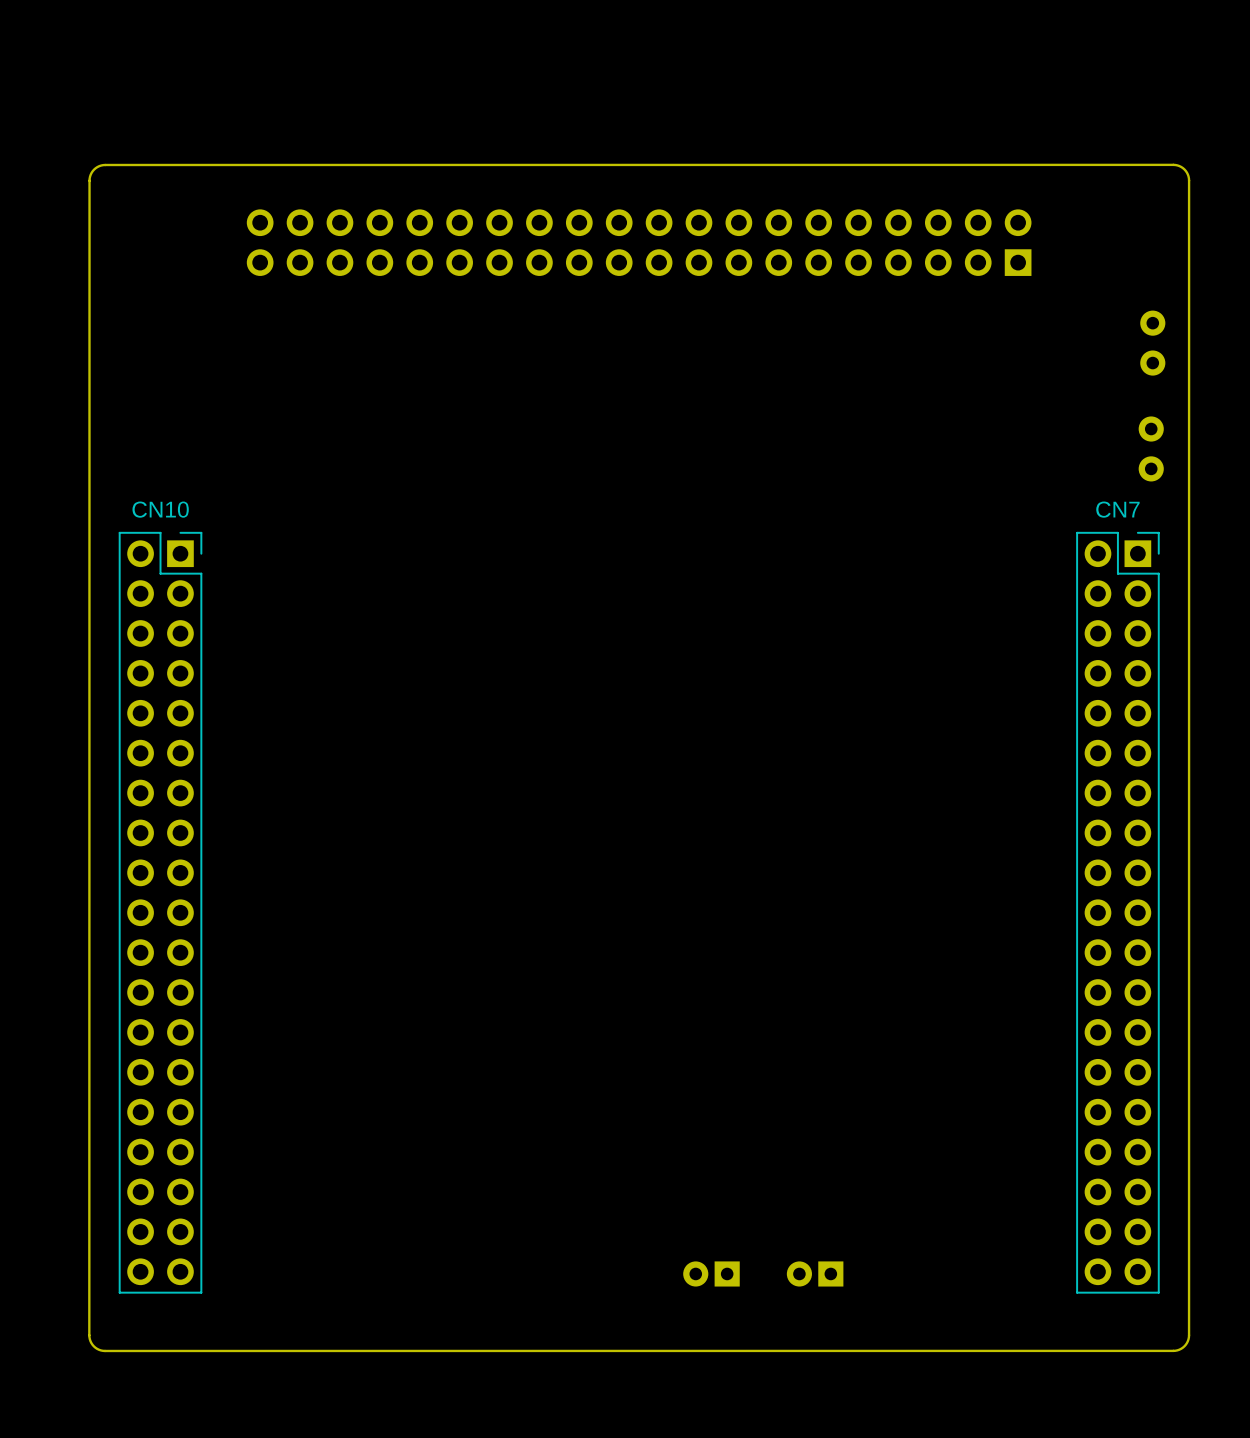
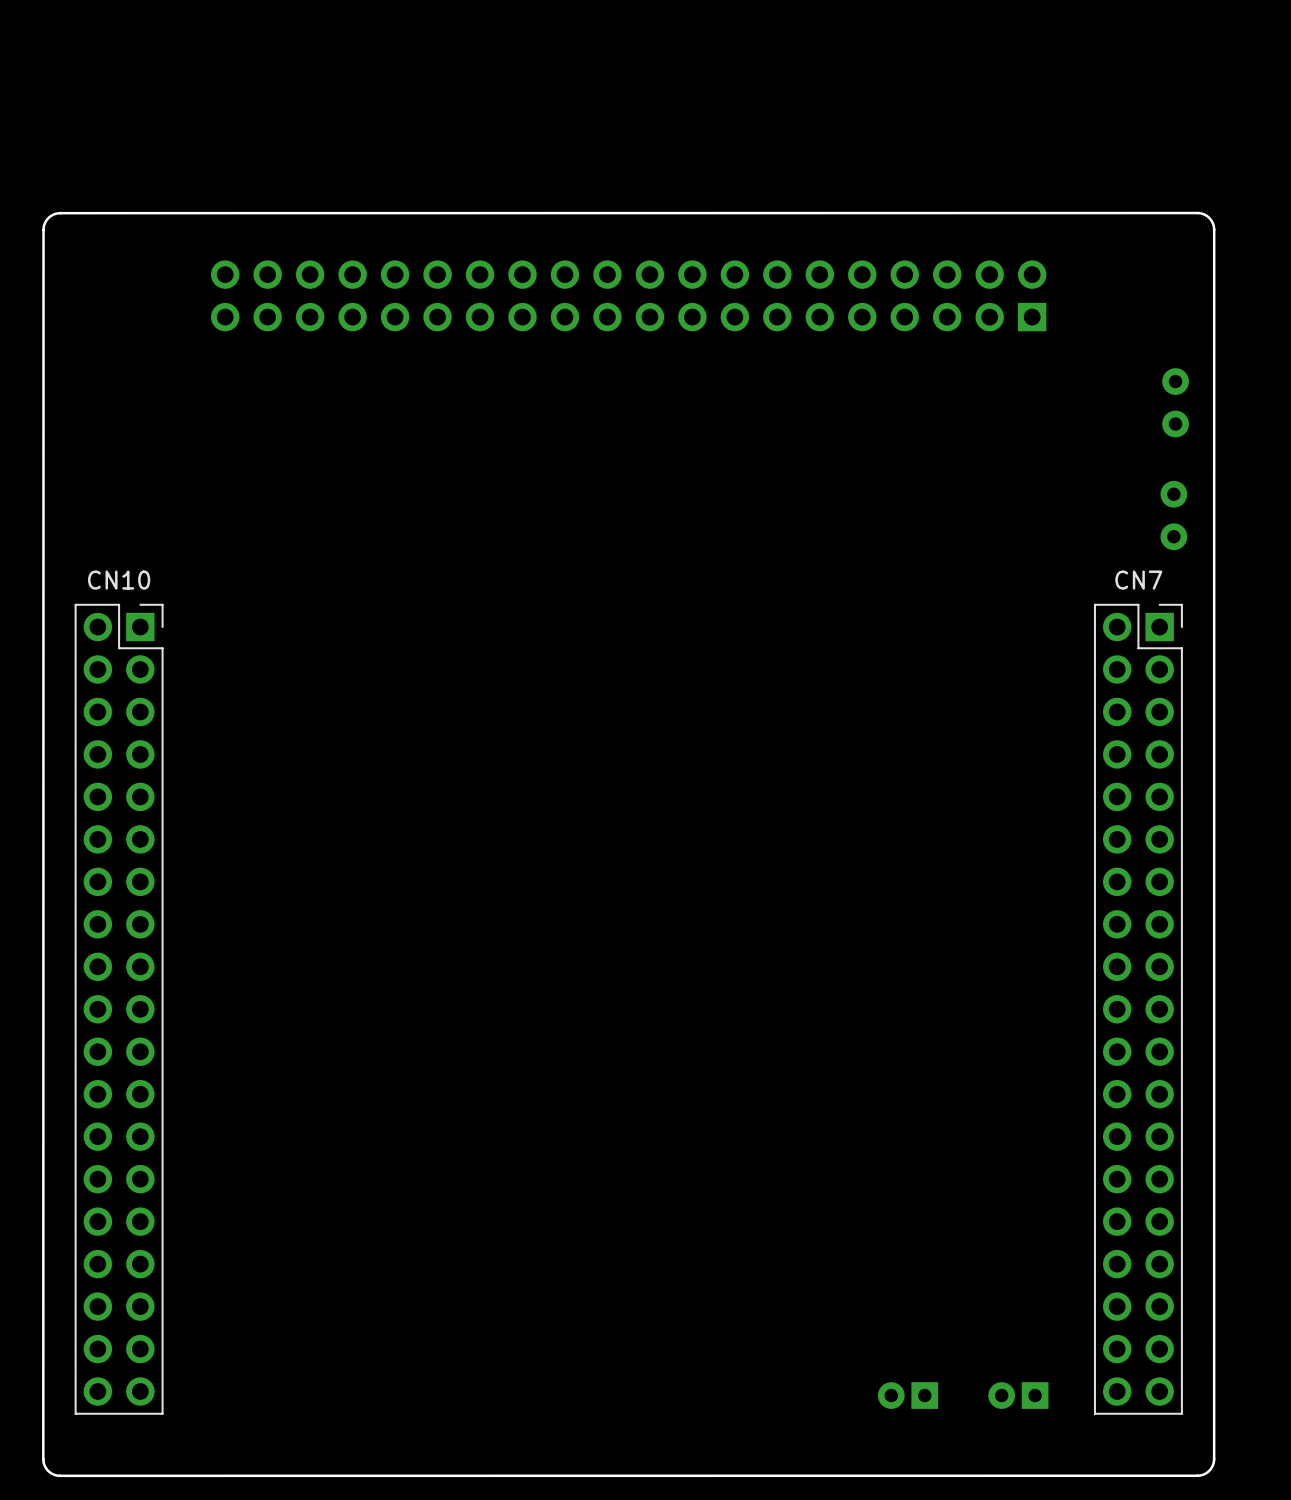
part: (711, 1273) -> none
part position: (815, 1273) -> (908, 1395)
part: none -> (1018, 1395)

